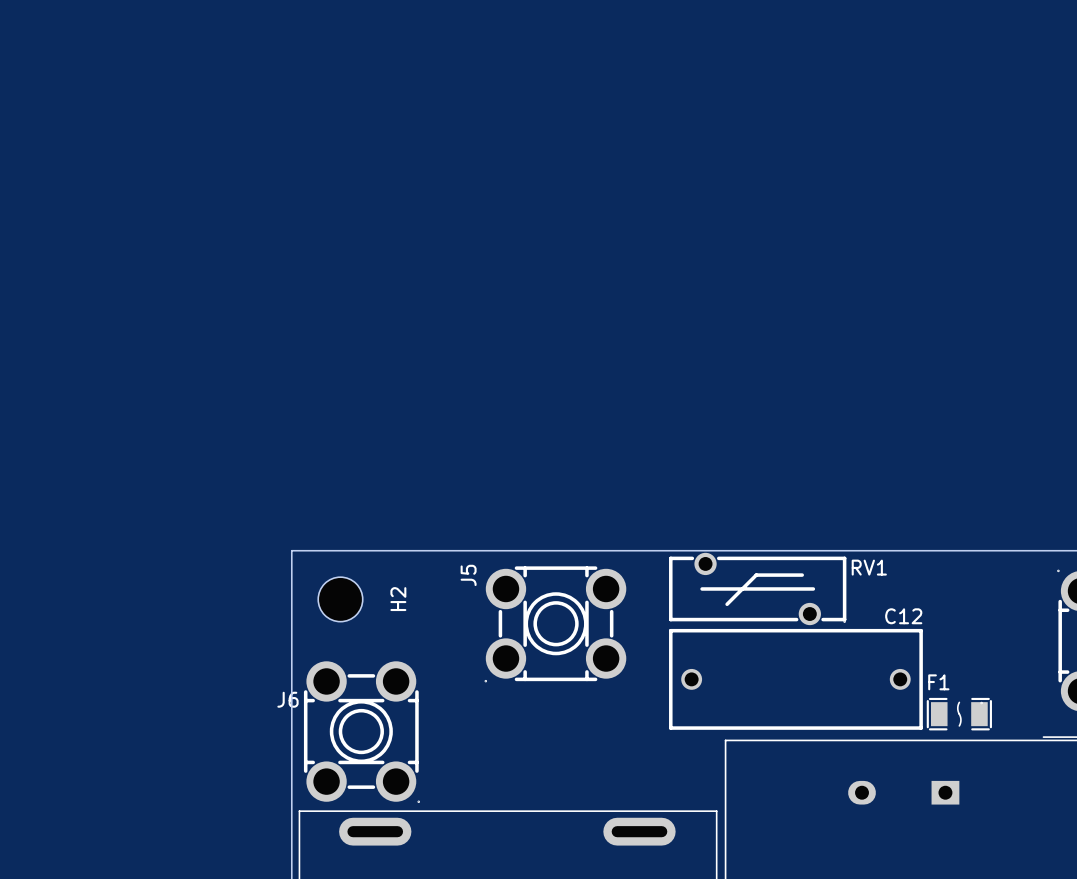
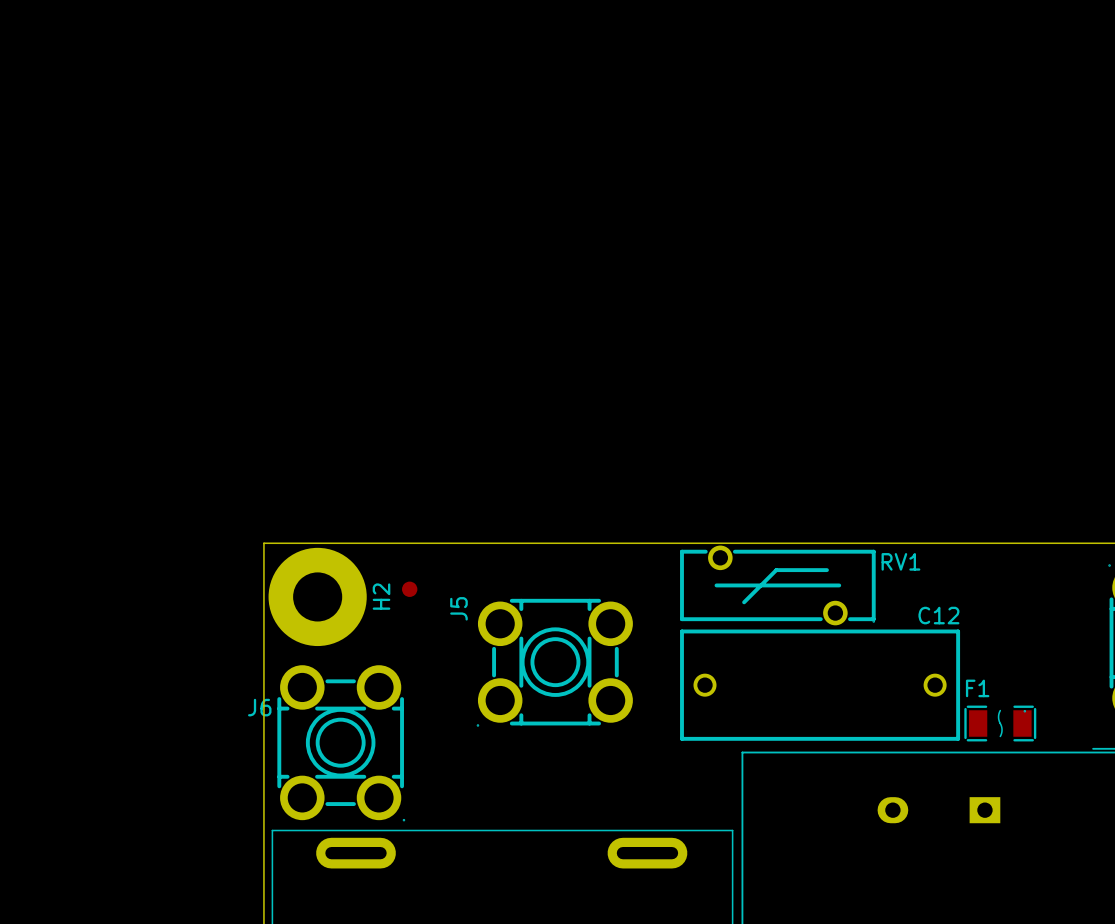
H2 footprint: [318, 577, 363, 622] -> [268, 547, 367, 647]
part: none -> (409, 589)
J5 position: (555, 624) -> (554, 662)

